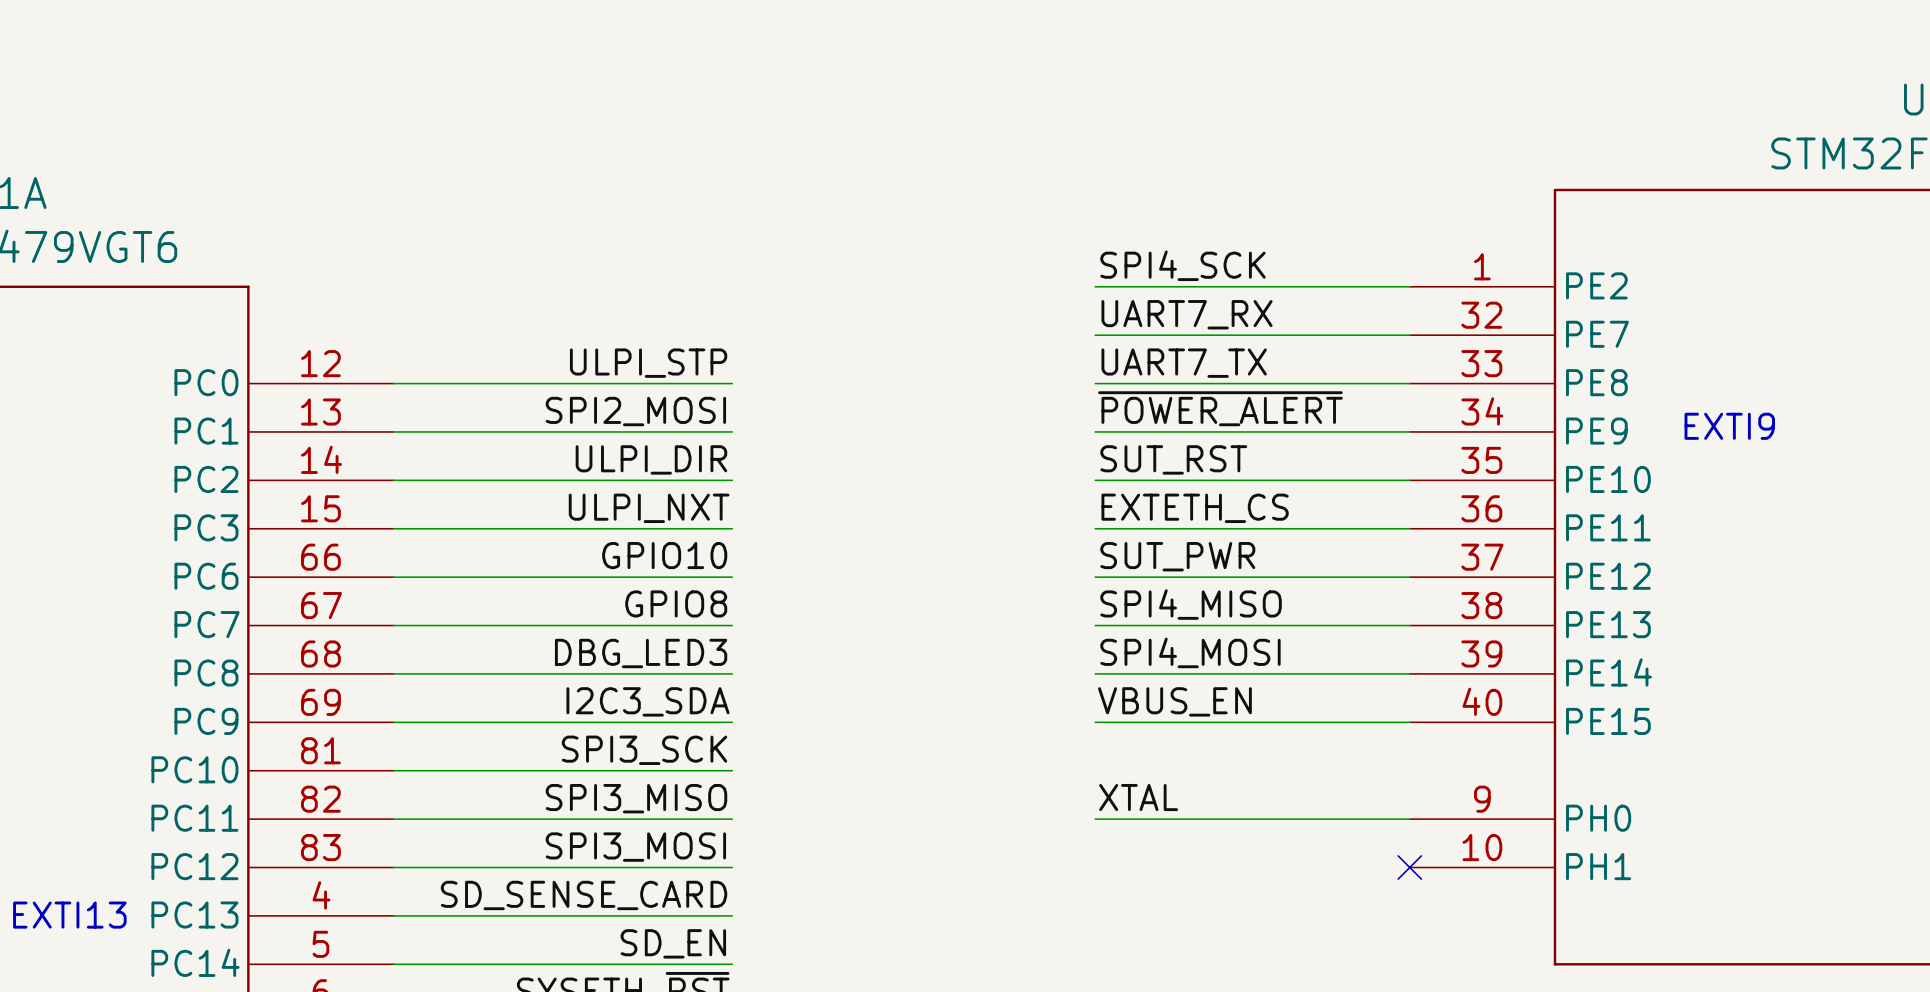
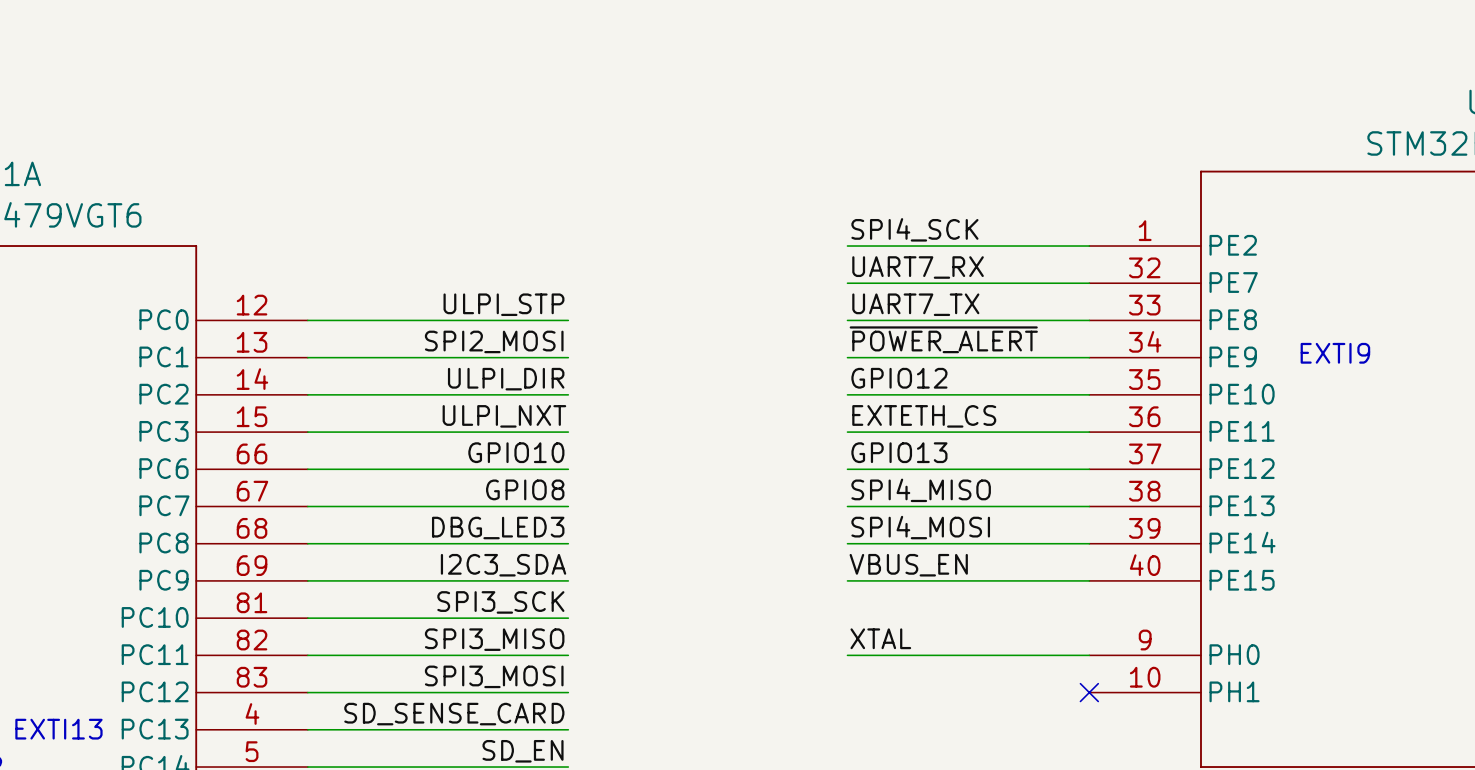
label: SUT_RST (1173, 459) -> GPIO12 (899, 378)
label: SUT_PWR (1177, 556) -> GPIO13 (899, 452)

